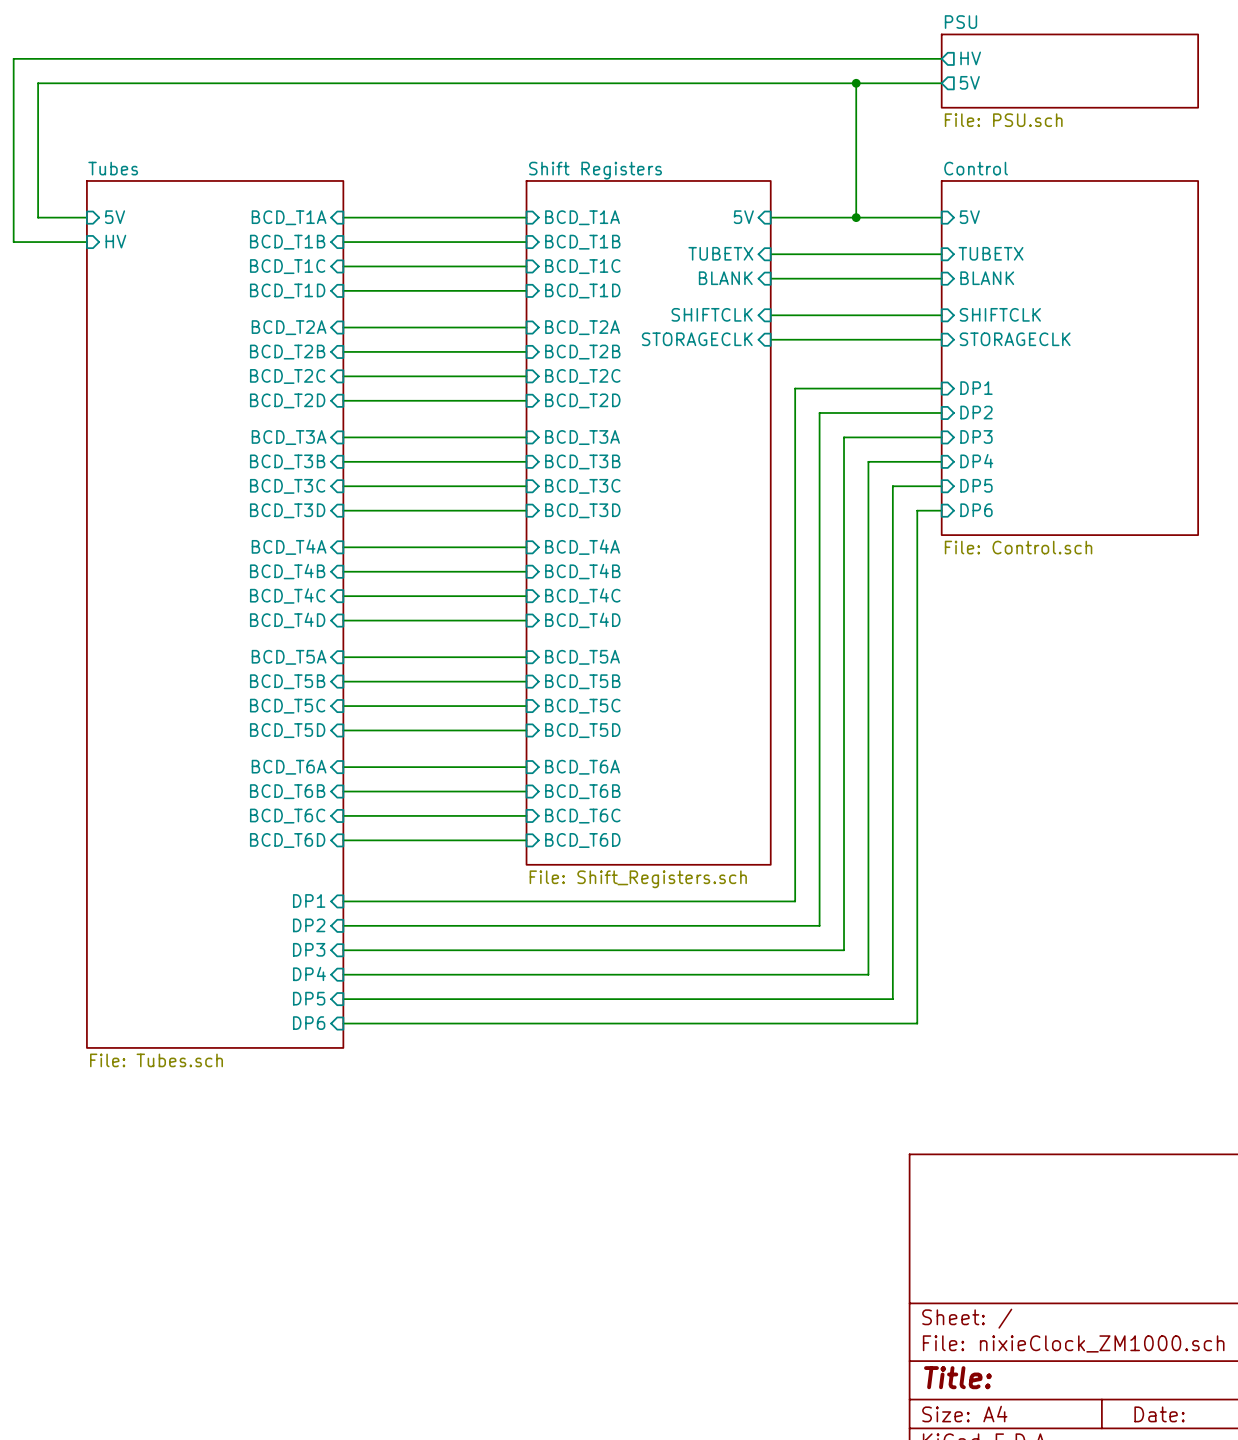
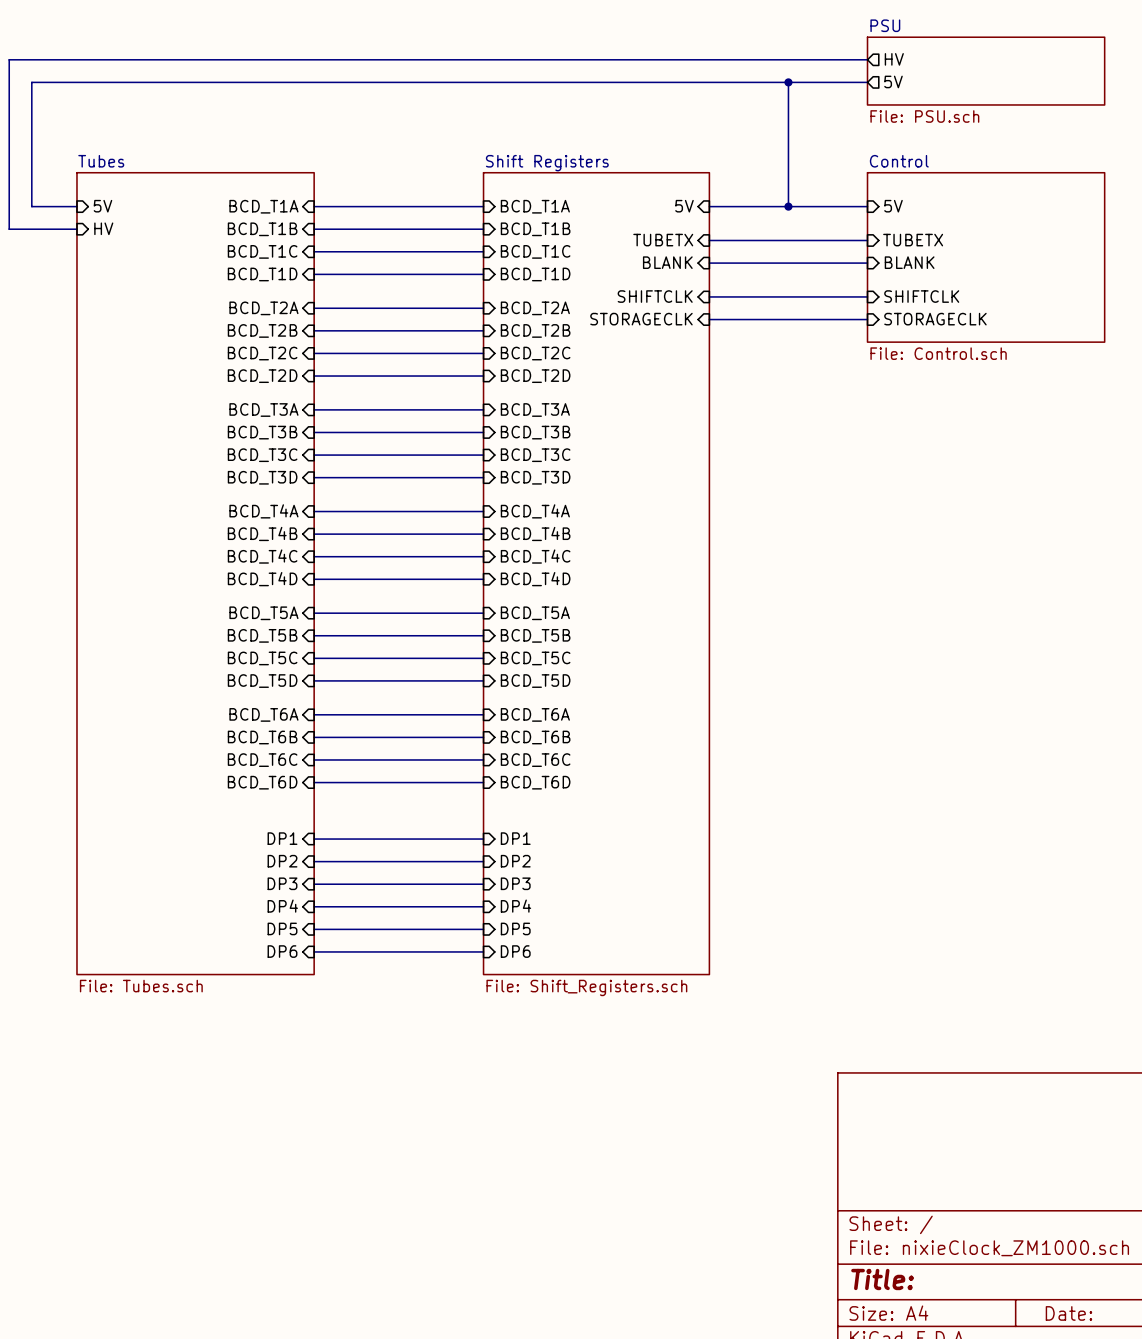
sheet Control: none -> File: Control.sch (986, 257)
sheet Control: File: Control.sch (1069, 358) -> none
wire: (941, 388) (795, 388) (795, 901) (526, 901) -> none
sheet pin: DP1 (976, 388) -> none
wire: (941, 412) (819, 412) (819, 925) (526, 925) -> none
sheet pin: DP2 (976, 412) -> none
sheet pin: DP3 (976, 436) -> none
wire: (941, 437) (844, 437) (844, 950) (526, 950) -> none
wire: (941, 461) (868, 461) (868, 974) (526, 974) -> none
sheet pin: DP4 (976, 461) -> none
sheet pin: DP5 (976, 485) -> none
wire: (941, 486) (892, 486) (892, 999) (526, 999) -> none
wire: (941, 510) (917, 510) (917, 1023) (526, 1023) -> none
sheet pin: DP6 (976, 510) -> none
sheet Shift Registers: File: Shift_Registers.sch (648, 522) -> none
sheet Shift Registers: none -> File: Shift_Registers.sch (596, 573)
sheet pin: none -> DP1 (515, 838)
sheet pin: none -> DP2 (515, 861)
sheet pin: none -> DP3 (515, 883)
sheet pin: none -> DP4 (515, 906)
sheet pin: none -> DP5 (515, 928)
sheet pin: none -> DP6 (515, 951)

